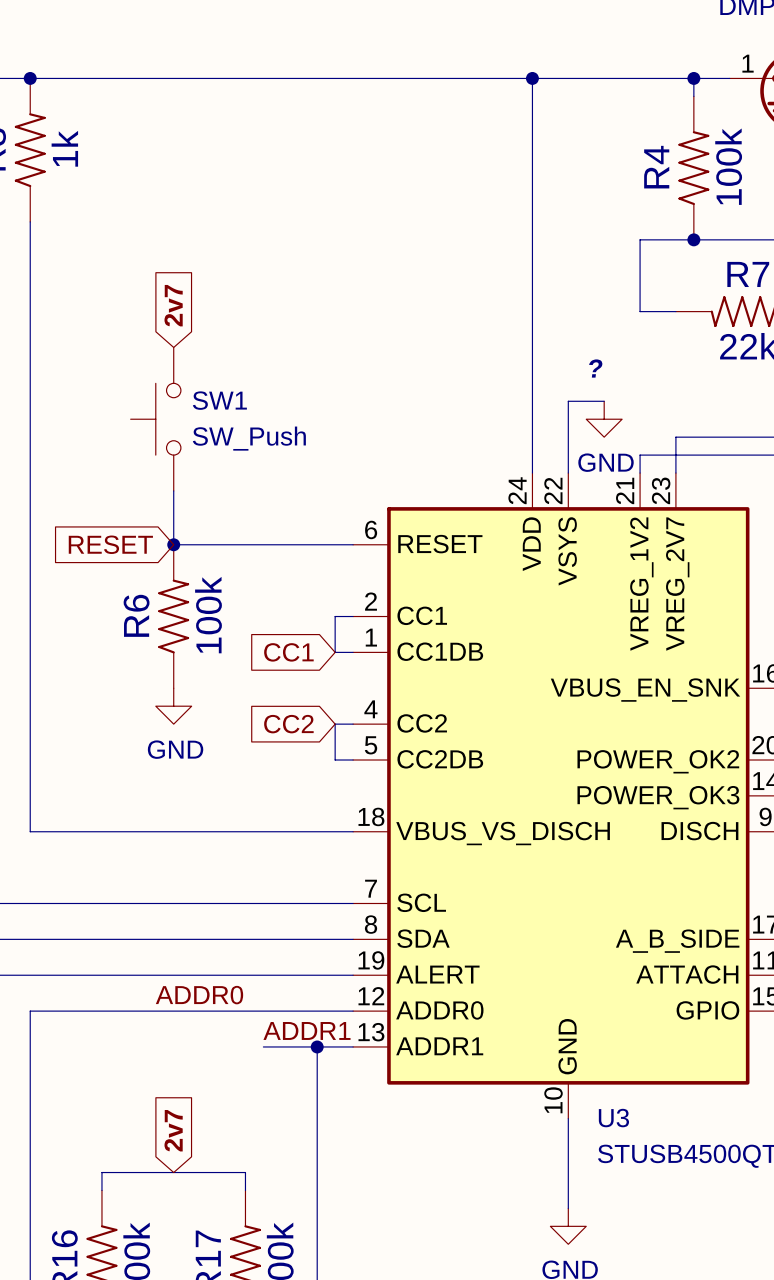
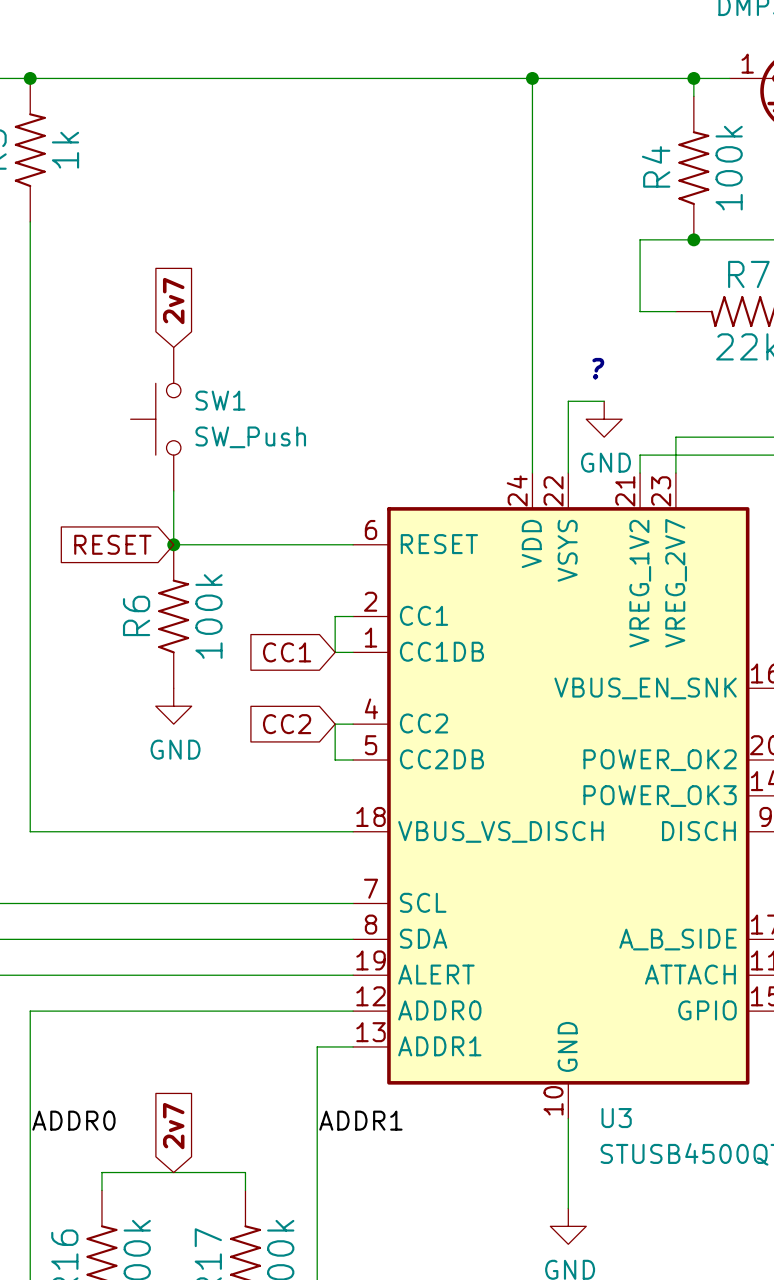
label position: ADDR0 (199, 995) -> ADDR0 (73, 1120)
label position: ADDR1 (306, 1030) -> ADDR1 (360, 1120)
wire: (263, 1046) (317, 1046) -> none
junction: (317, 1046) -> none

